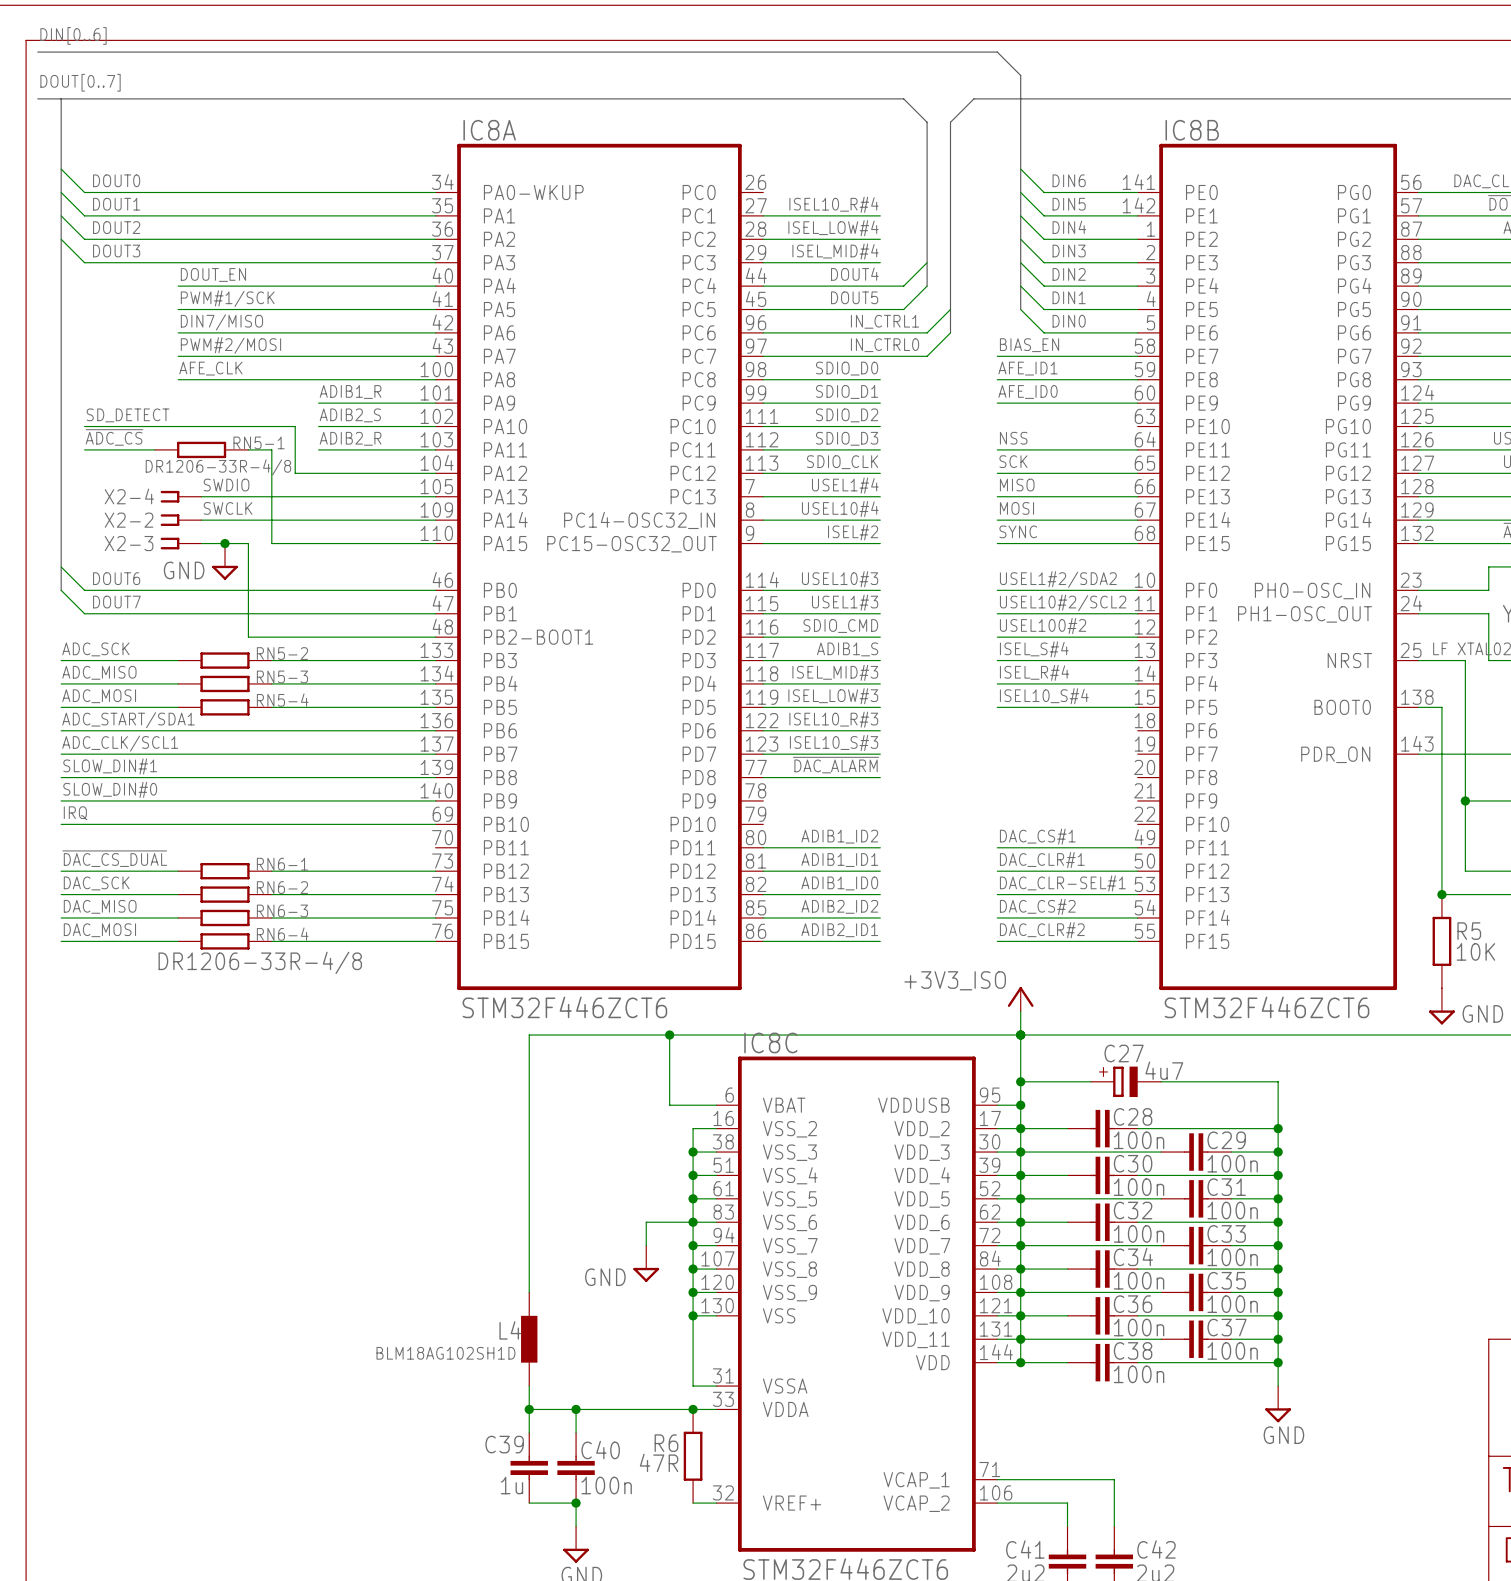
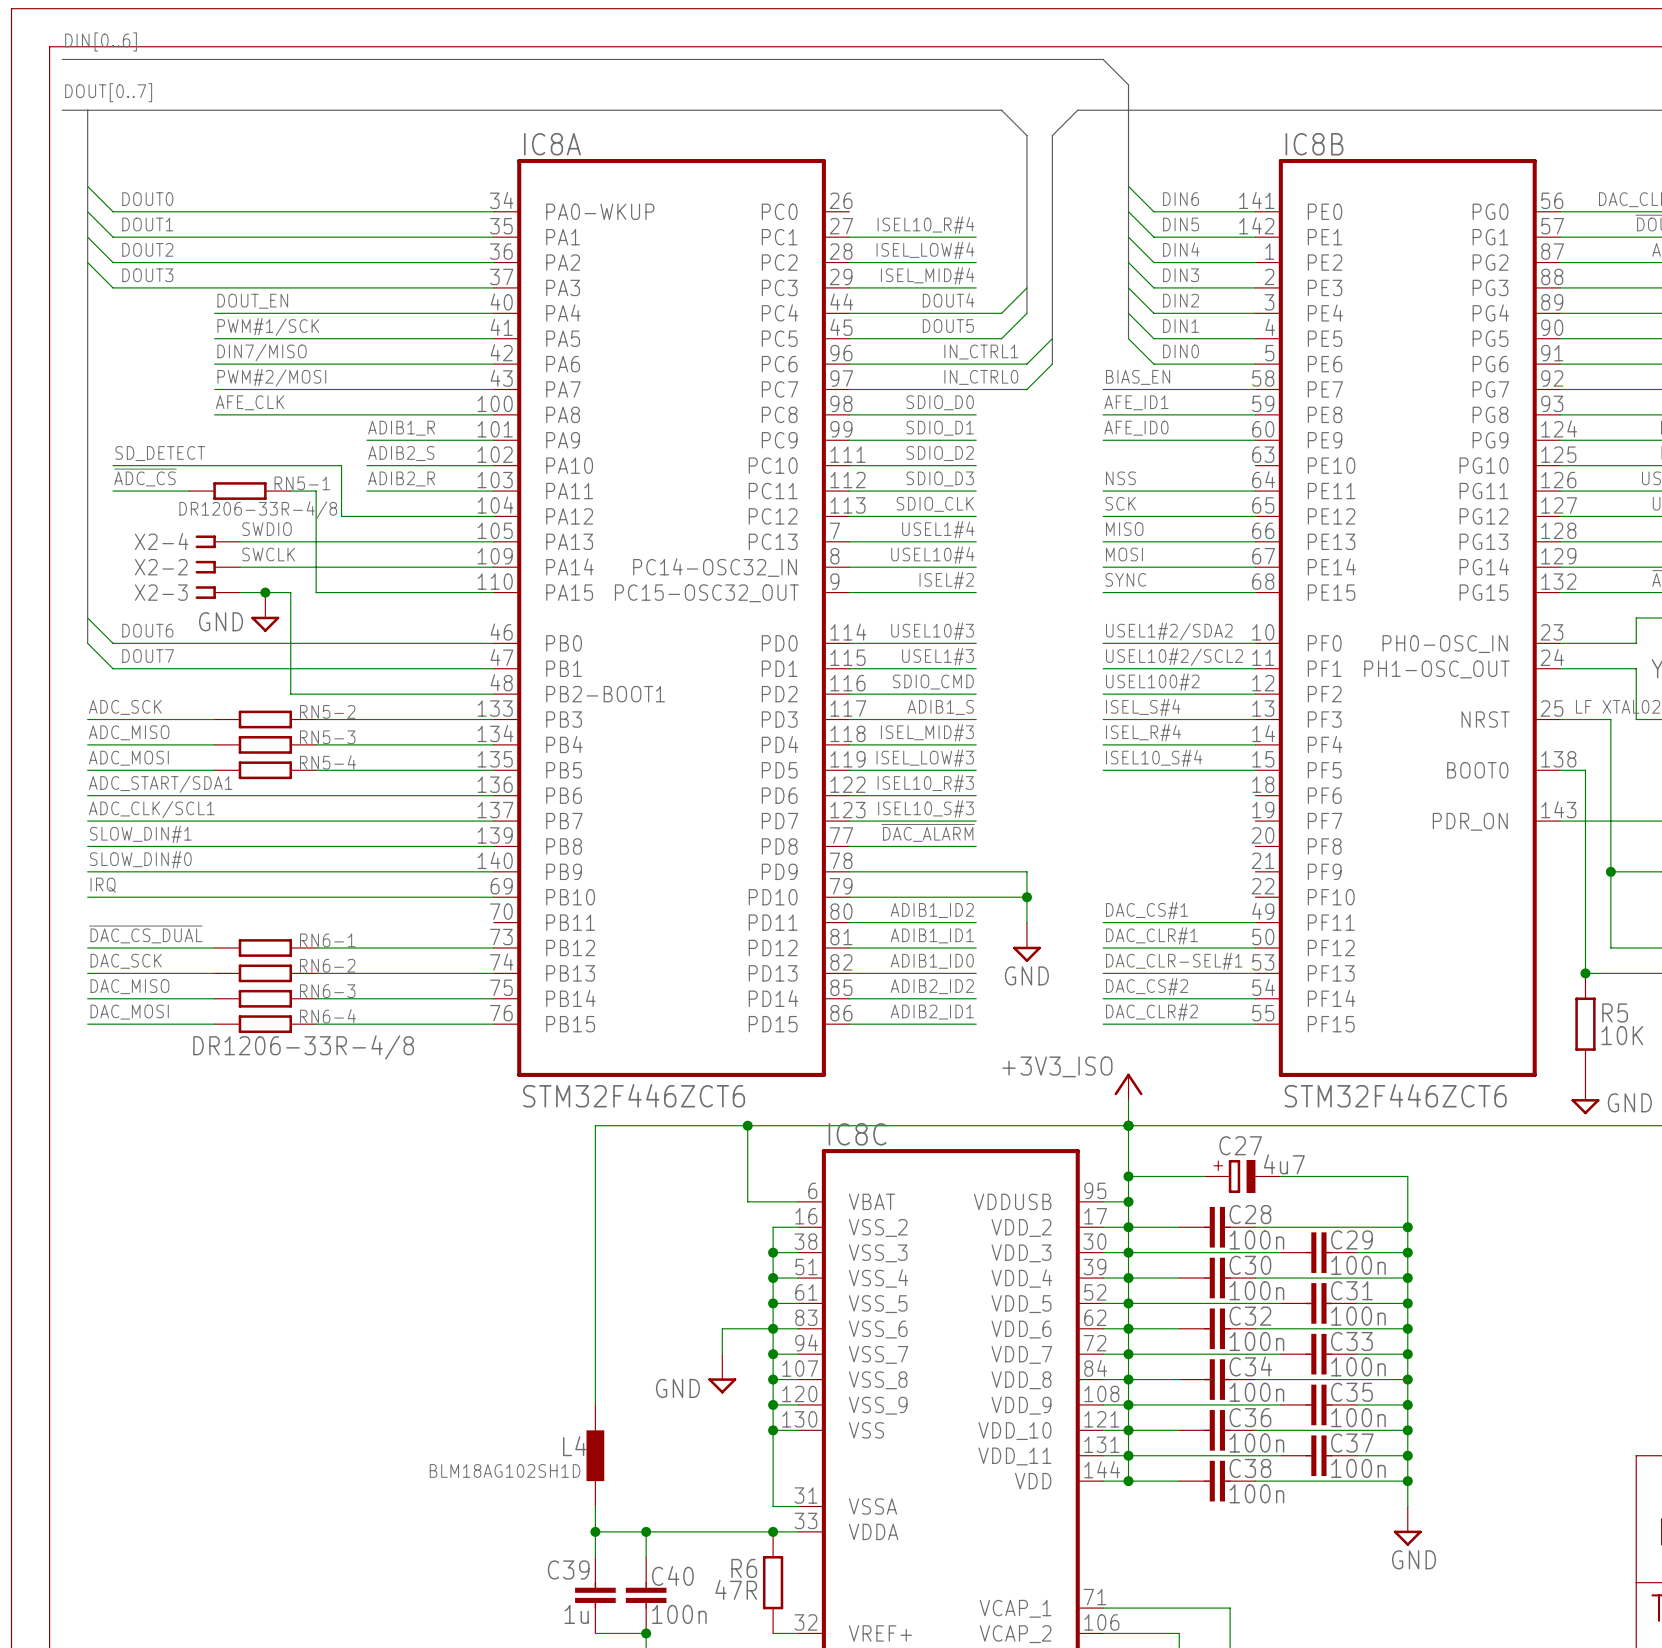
wire: none -> (849, 871) (1026, 871) (1026, 922)
wire: none -> (849, 897) (1026, 897)
junction: none -> (1026, 897)
power symbol: none -> GND (1026, 942)

